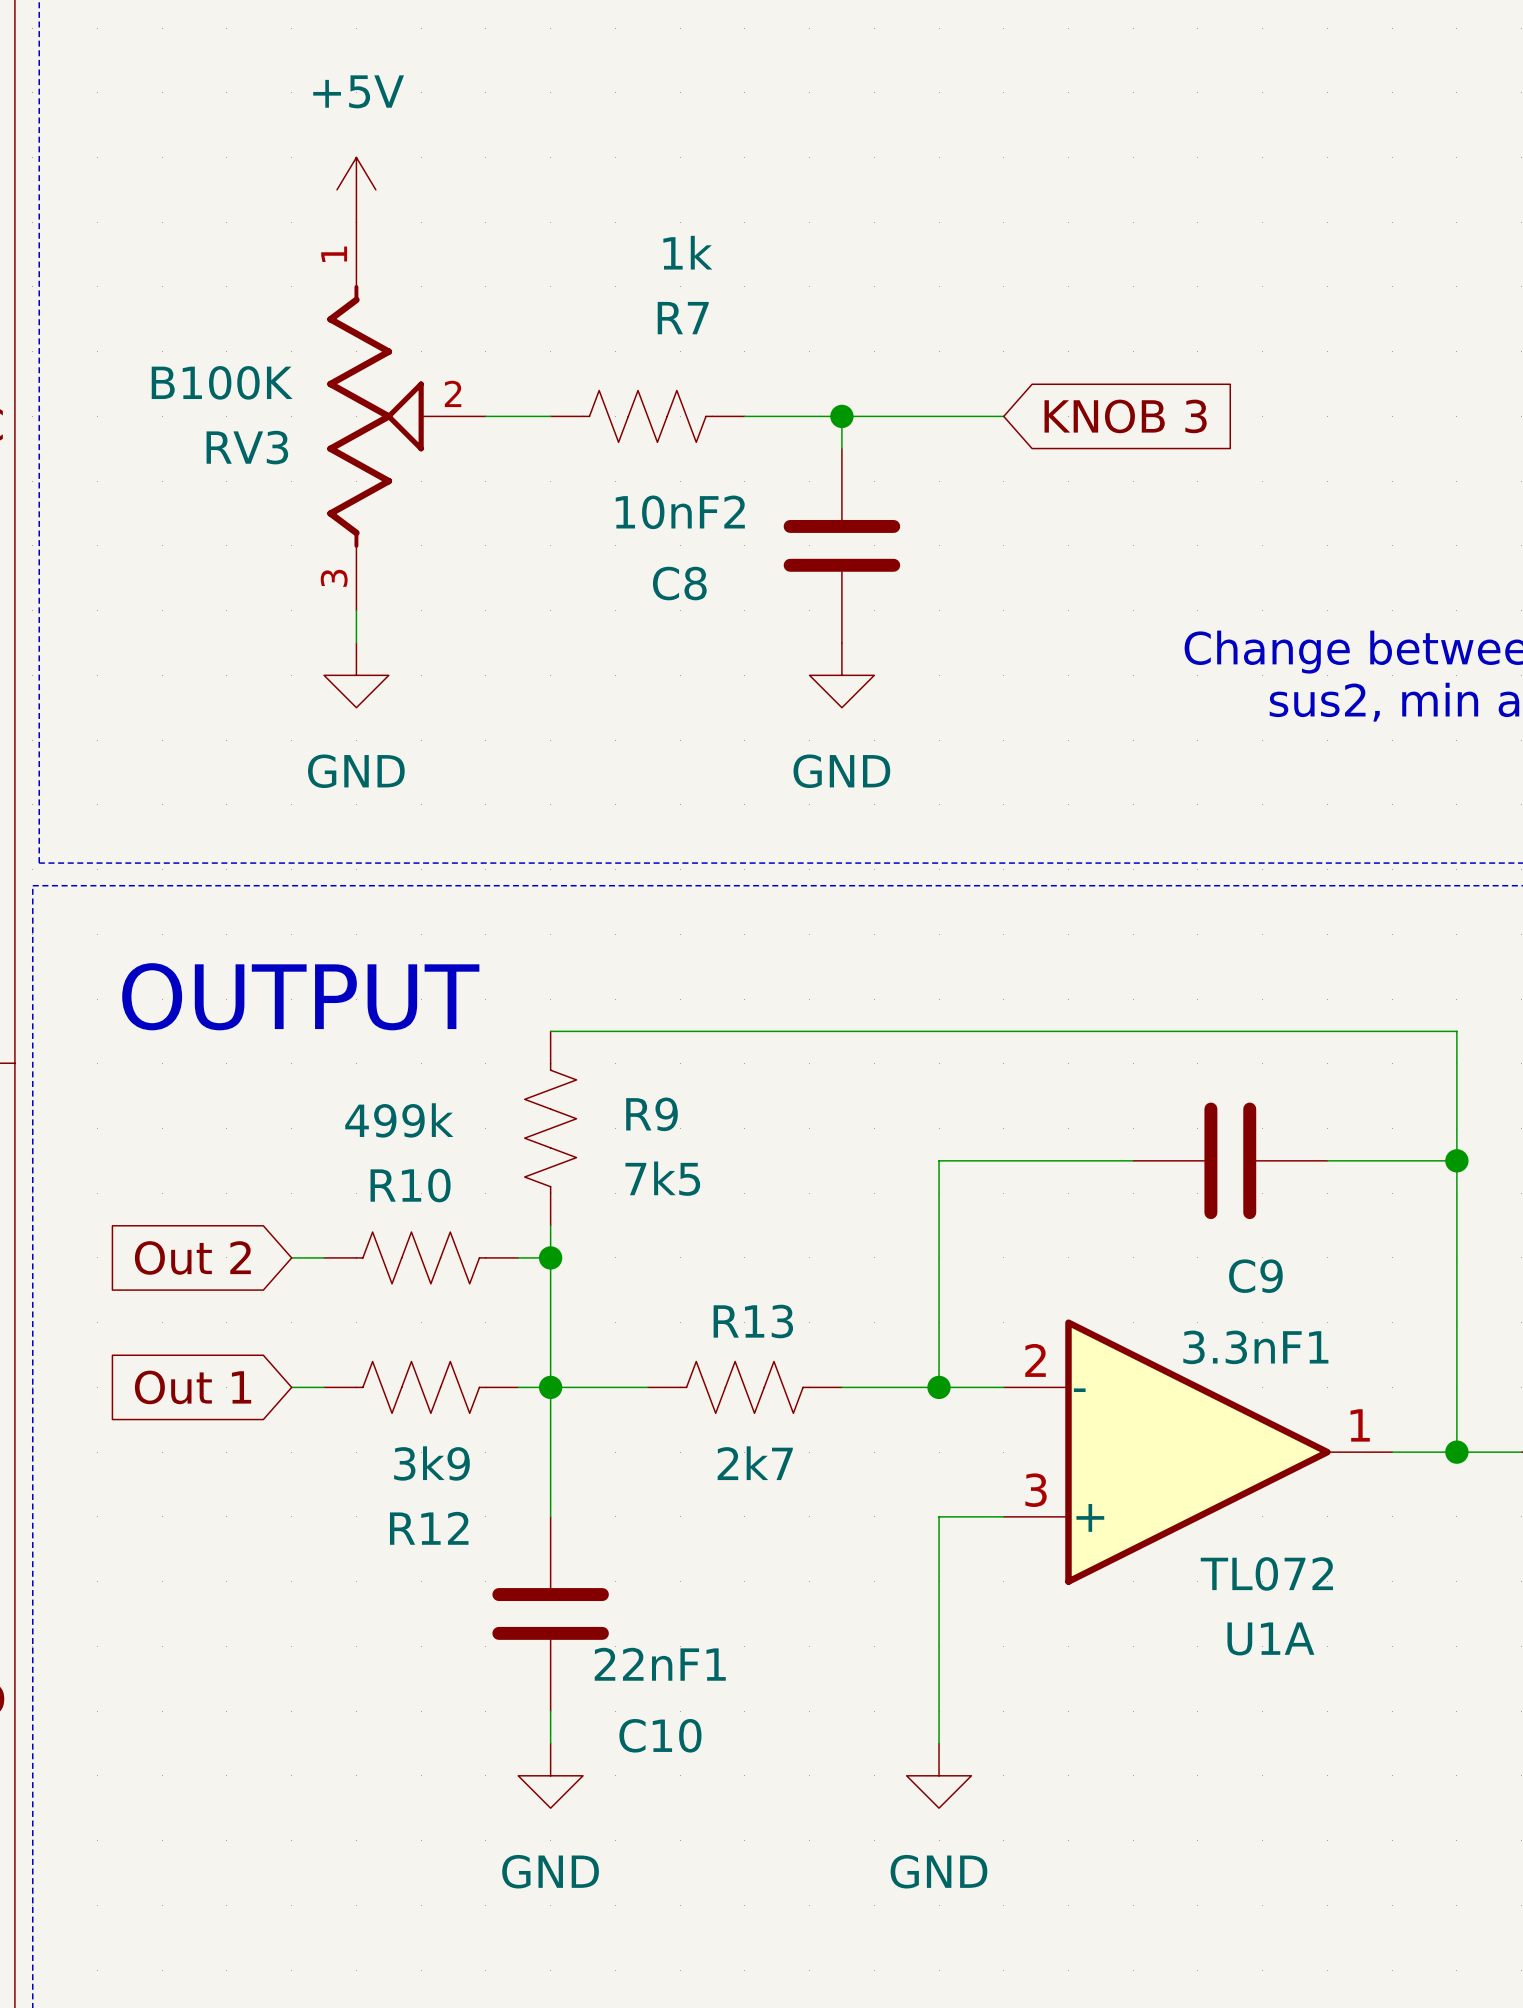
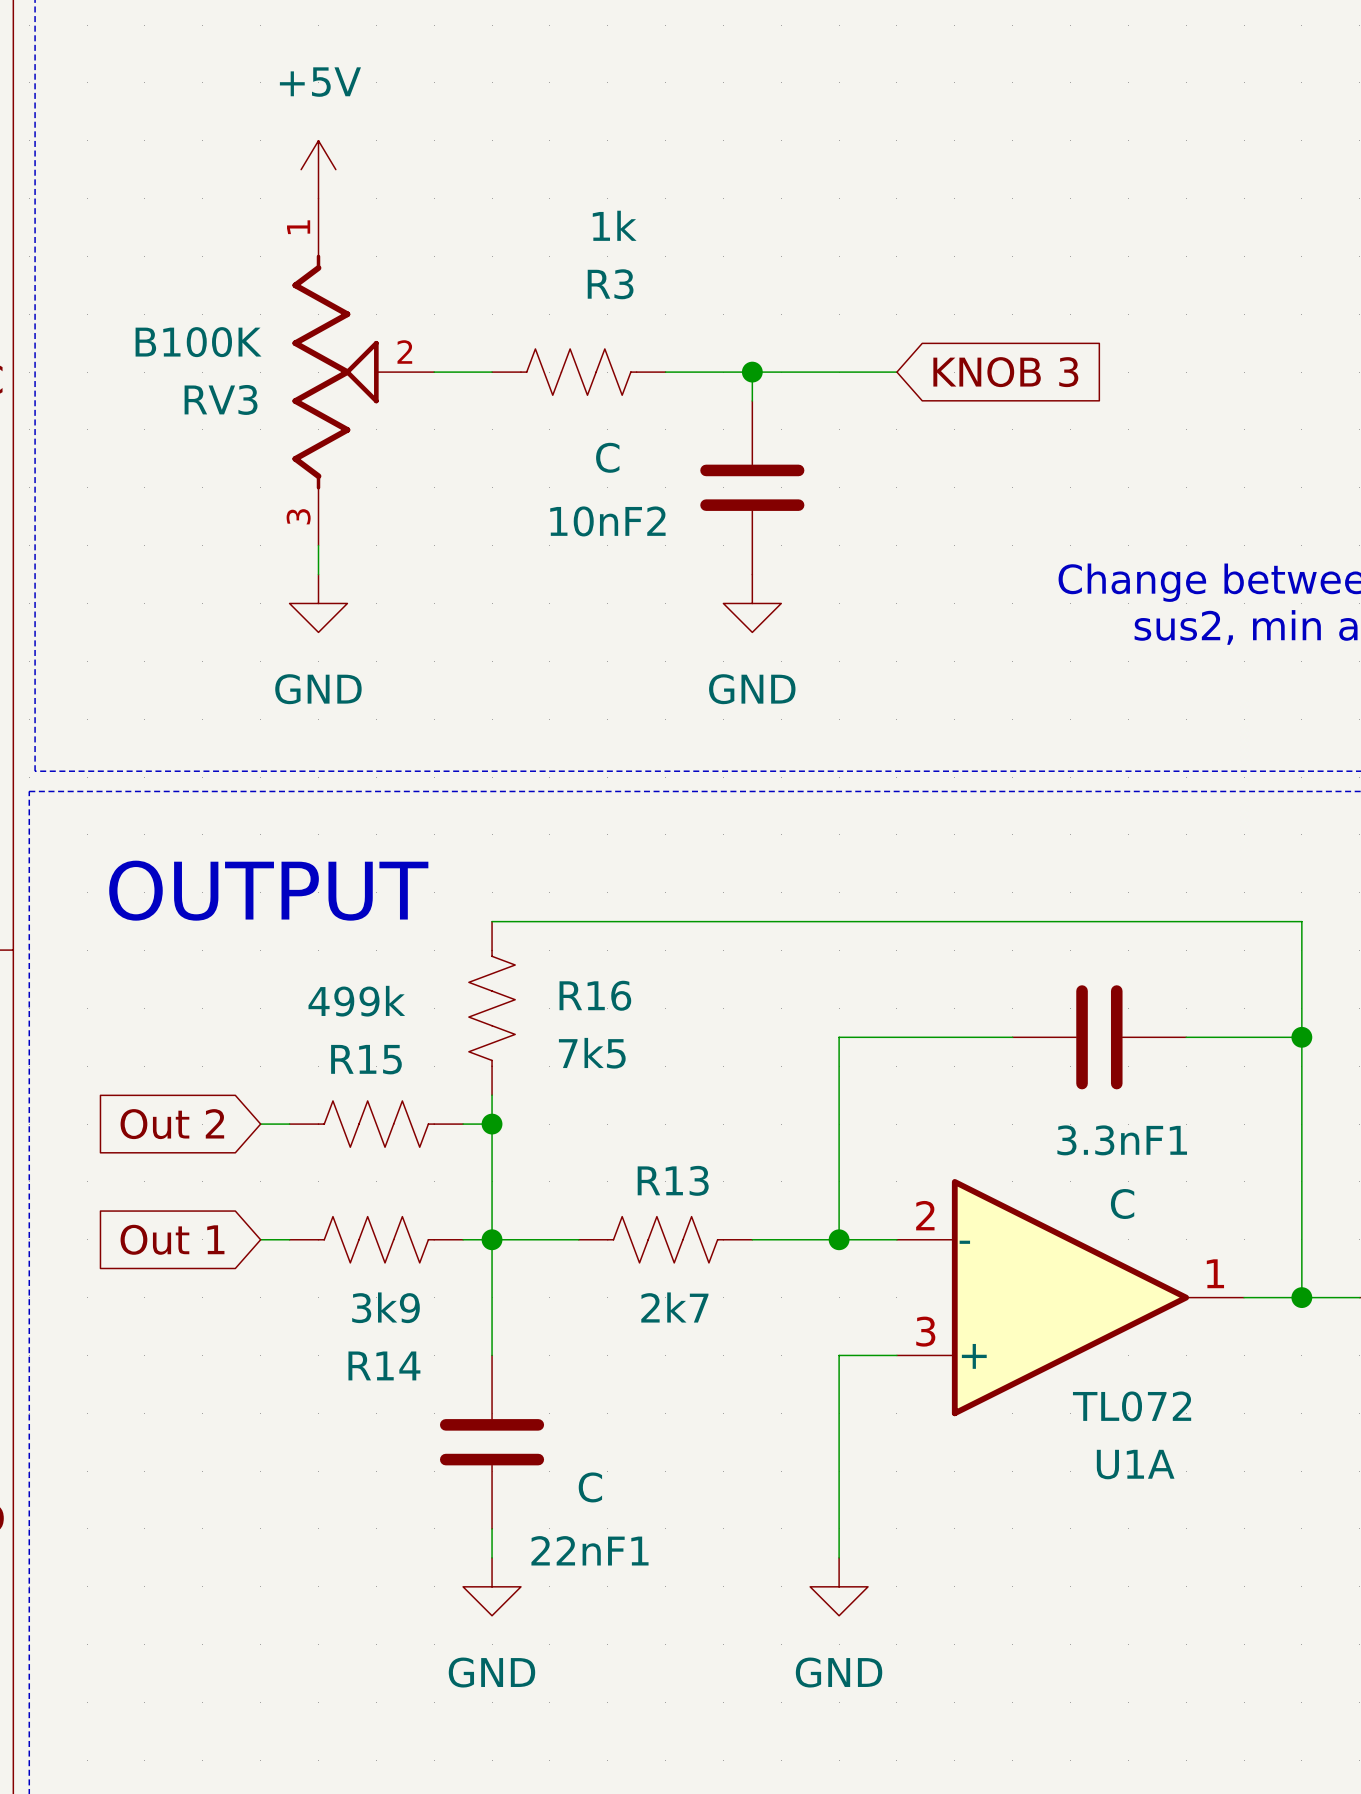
R7 name: R7 (683, 318) -> R3 (610, 284)
C8 value: 10nF2 (680, 512) -> C (607, 457)
C8 name: C8 (679, 583) -> 10nF2 (607, 521)
R9 name: R9 (651, 1114) -> R16 (595, 995)
R10 name: R10 (410, 1185) -> R15 (366, 1059)
C9 name: C9 (1255, 1276) -> 3.3nF1 (1122, 1140)
C9 value: 3.3nF1 (1255, 1347) -> C (1122, 1204)
R12 name: R12 (429, 1528) -> R14 (384, 1365)
C10 value: 22nF1 (660, 1664) -> C (590, 1487)
C10 name: C10 (660, 1735) -> 22nF1 (589, 1550)

